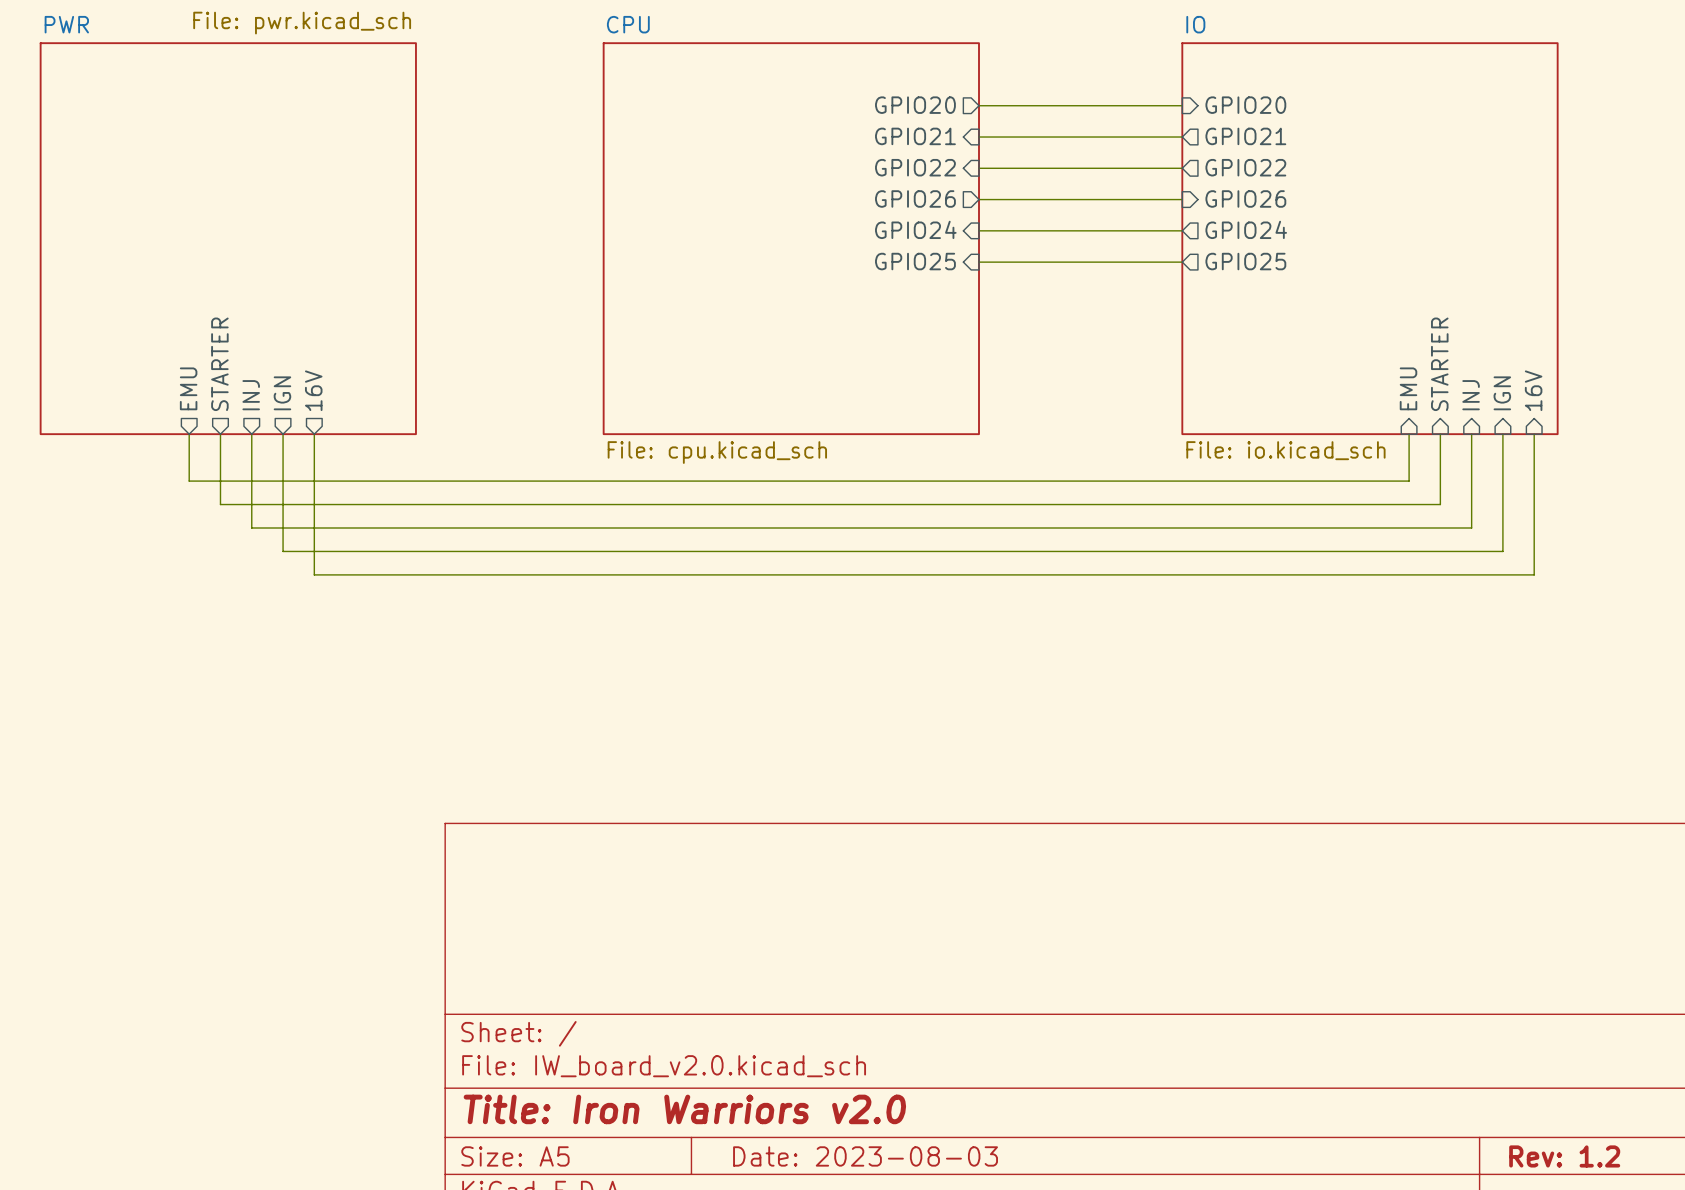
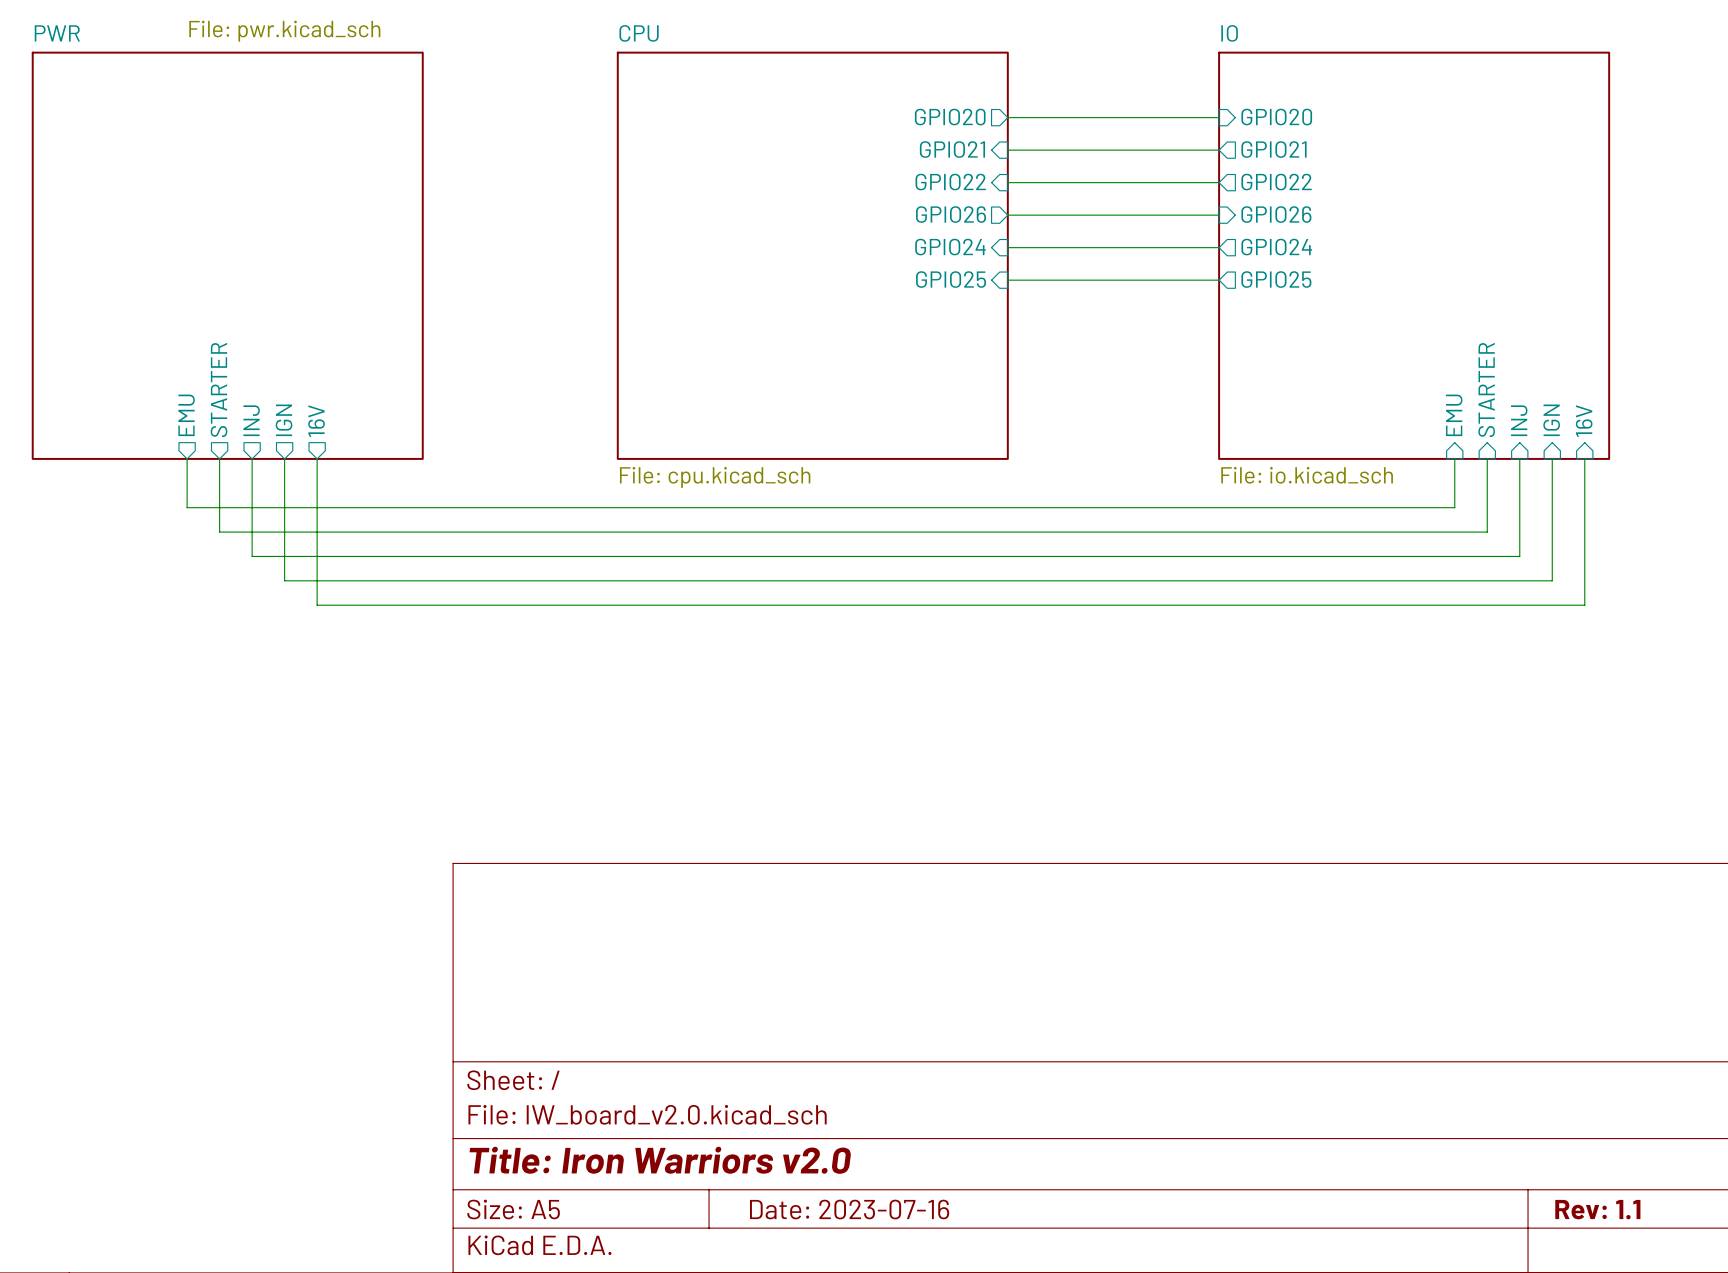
title block: Date: 2023-08-03 (865, 1156) -> Date: 2023-07-16 (849, 1209)
title block: Rev: 1.2 (1564, 1156) -> Rev: 1.1 (1597, 1209)

